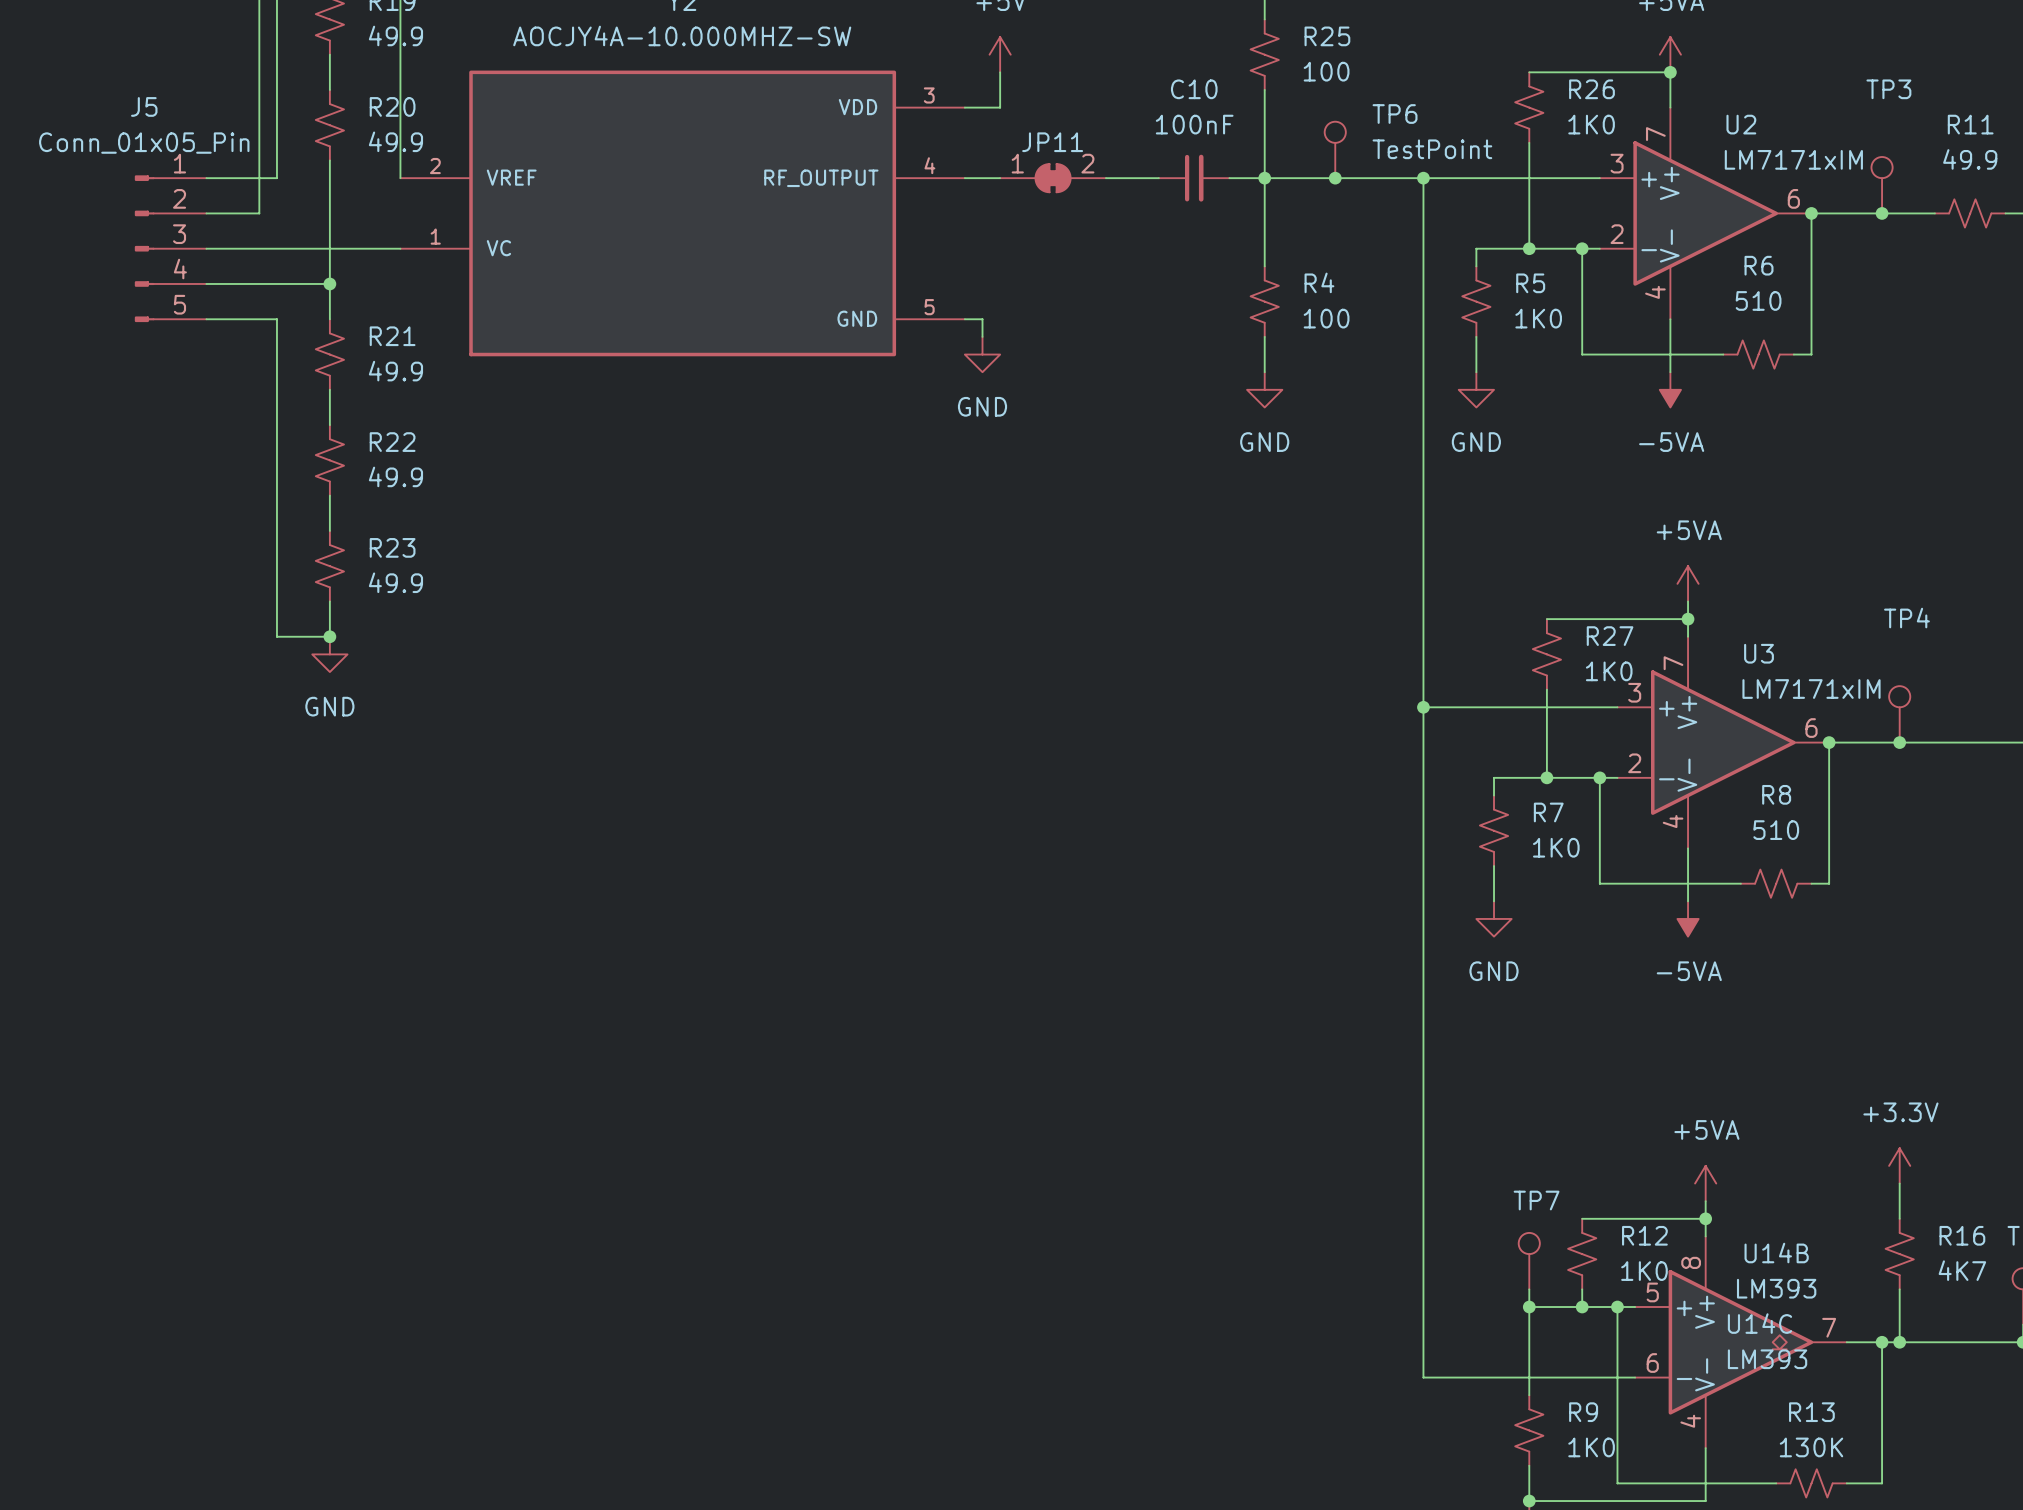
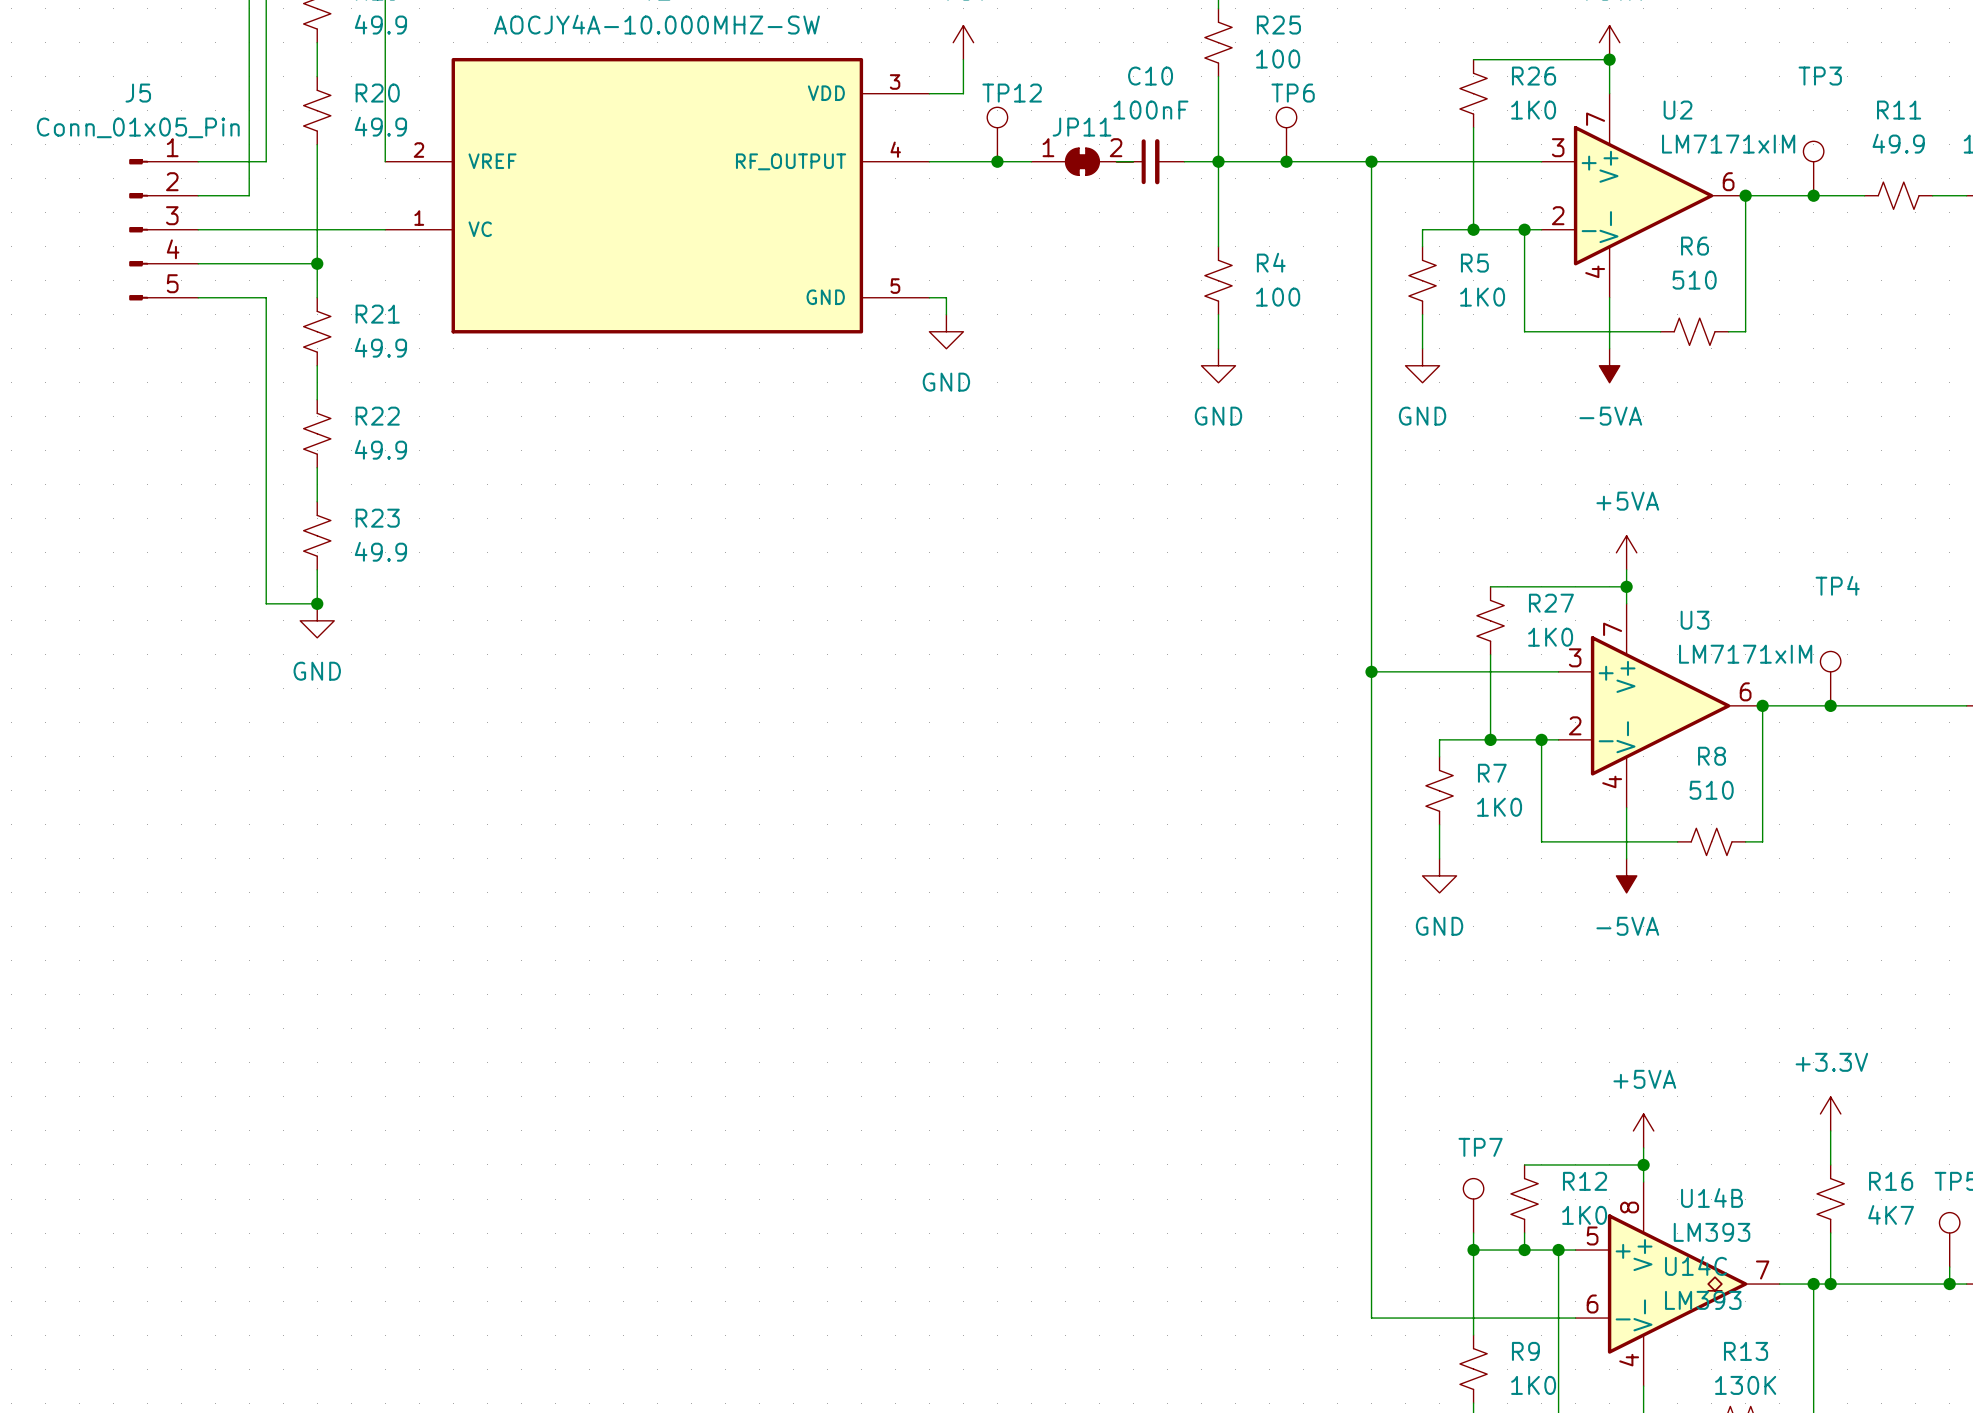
TP6 name position: TP6 (1395, 114) -> TP6 (1293, 93)
TP12: none -> (997, 134)
TP6 value: TestPoint (1432, 149) -> none
junction: none -> (997, 161)
JP11 position: (1053, 178) -> (1082, 161)

